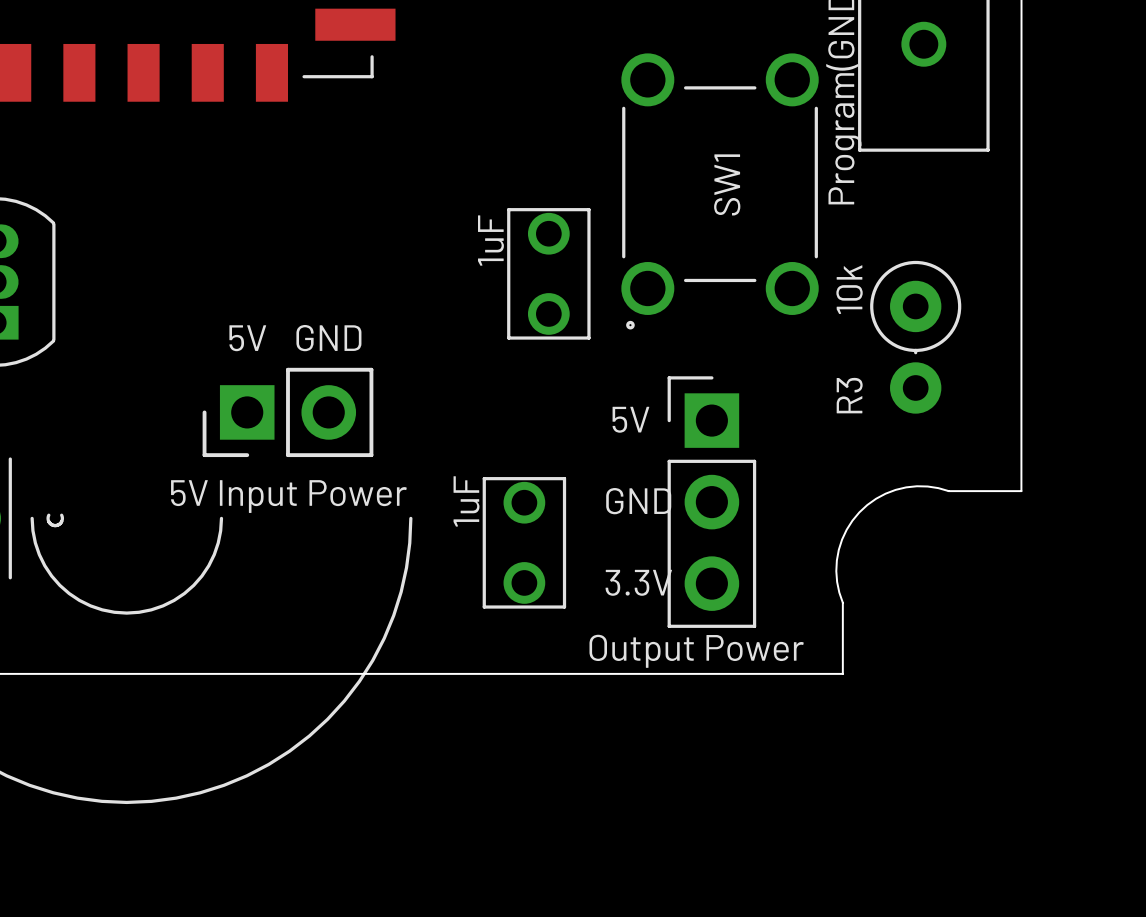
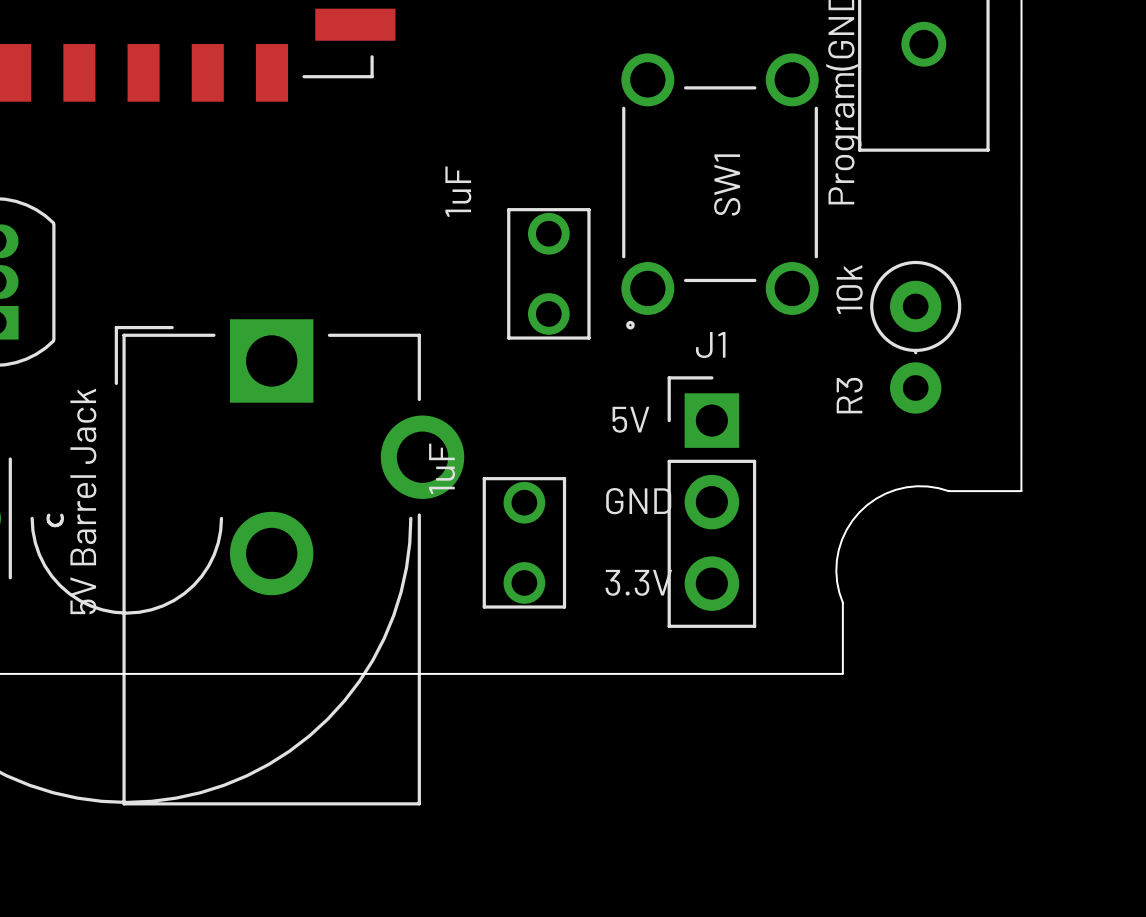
text position: 1uF (490, 240) -> 1uF (458, 191)
text: 5V (247, 338) -> none
text: GND (328, 338) -> none
part: (287, 412) -> none
text: 5V Input Power (288, 496) -> none
text: none -> 5V Barrel Jack (83, 501)
text position: 1uF (466, 501) -> 1uF (442, 468)
part: none -> (289, 562)
Output Power name: Output Power (696, 651) -> J1 (710, 344)

